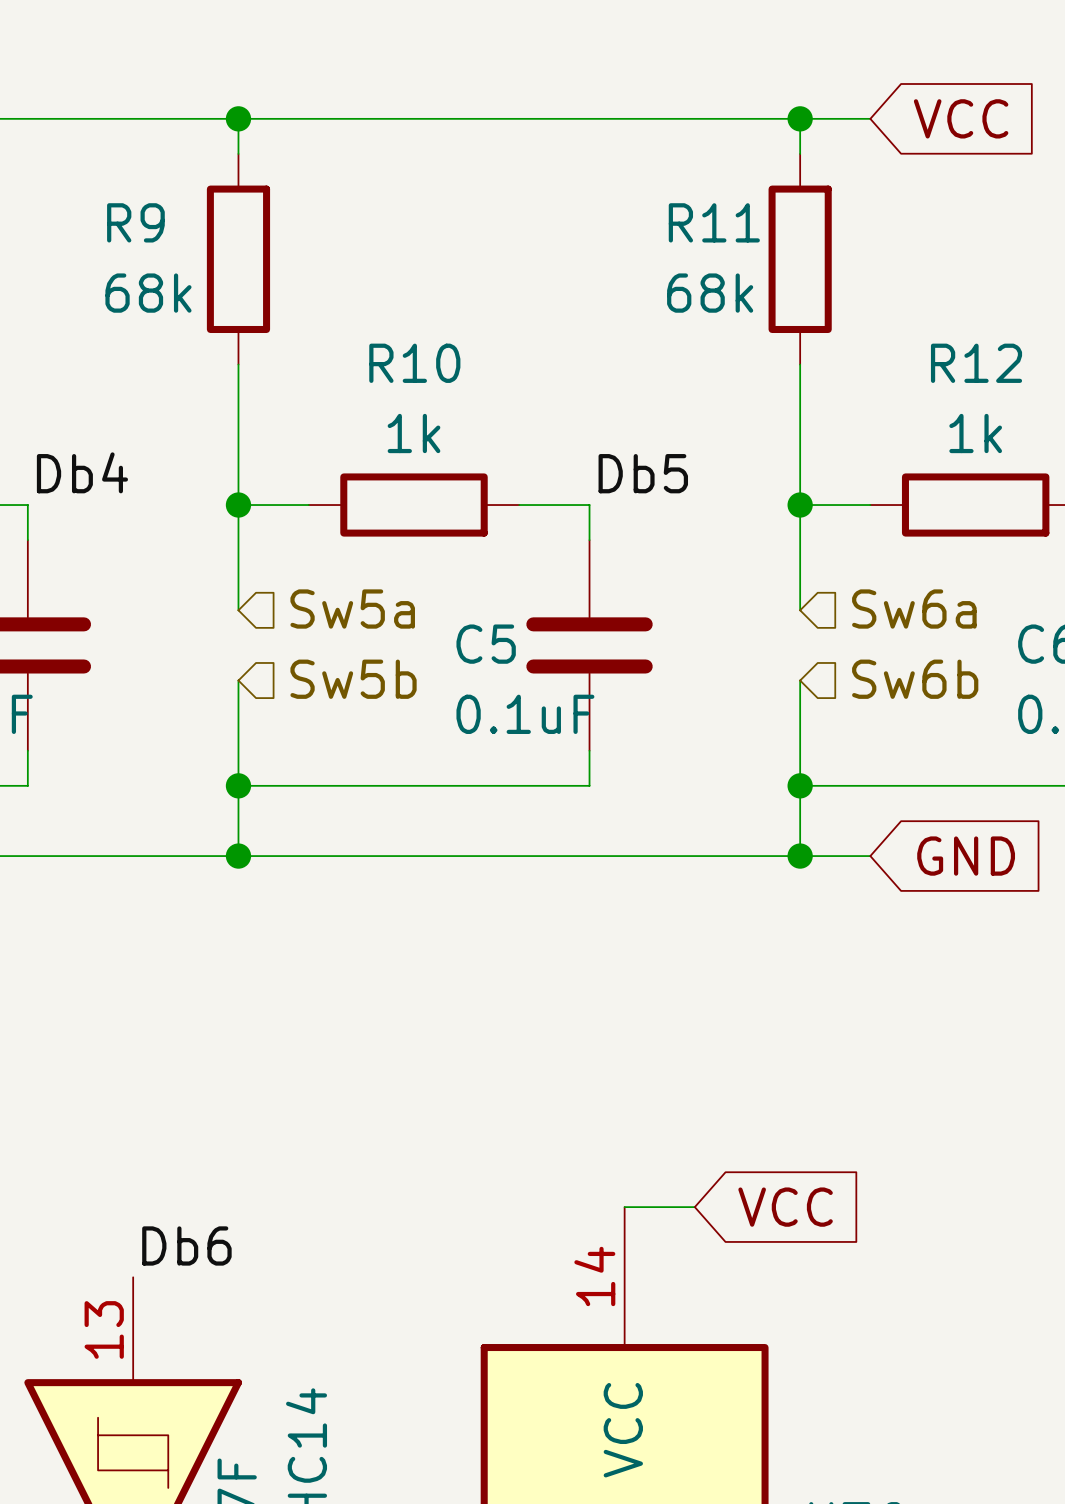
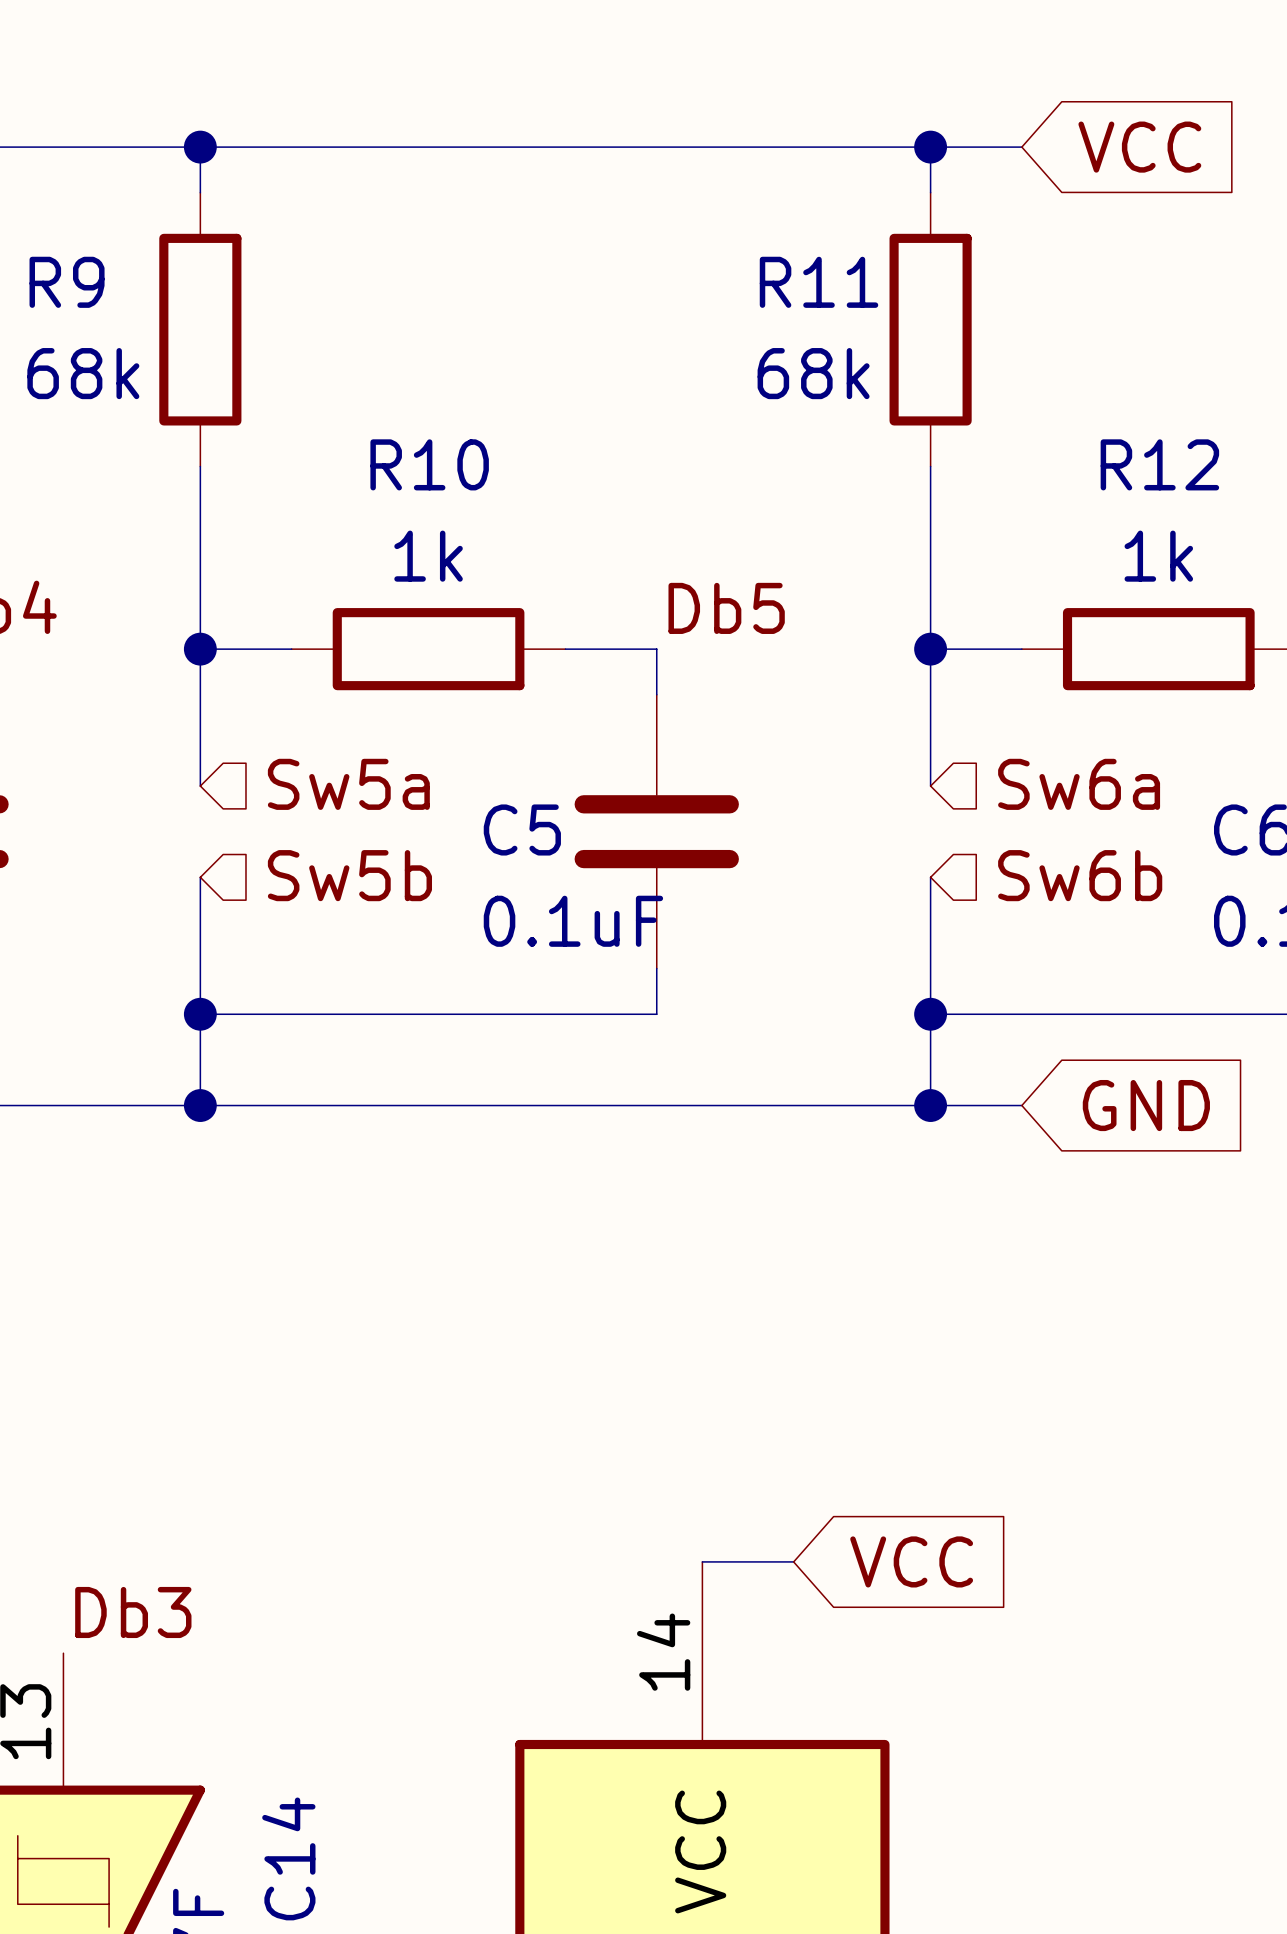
label: Db6 (186, 1245) -> Db3 (133, 1612)

